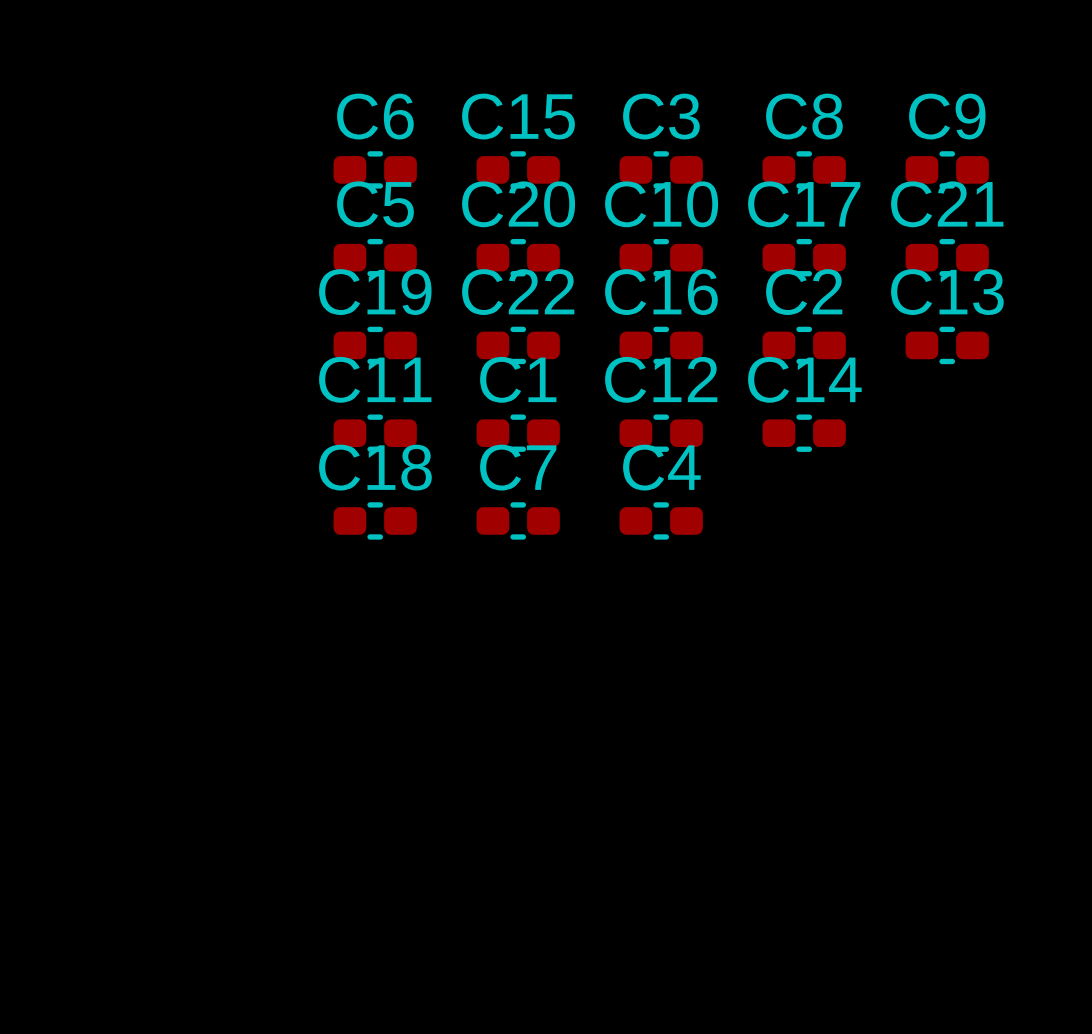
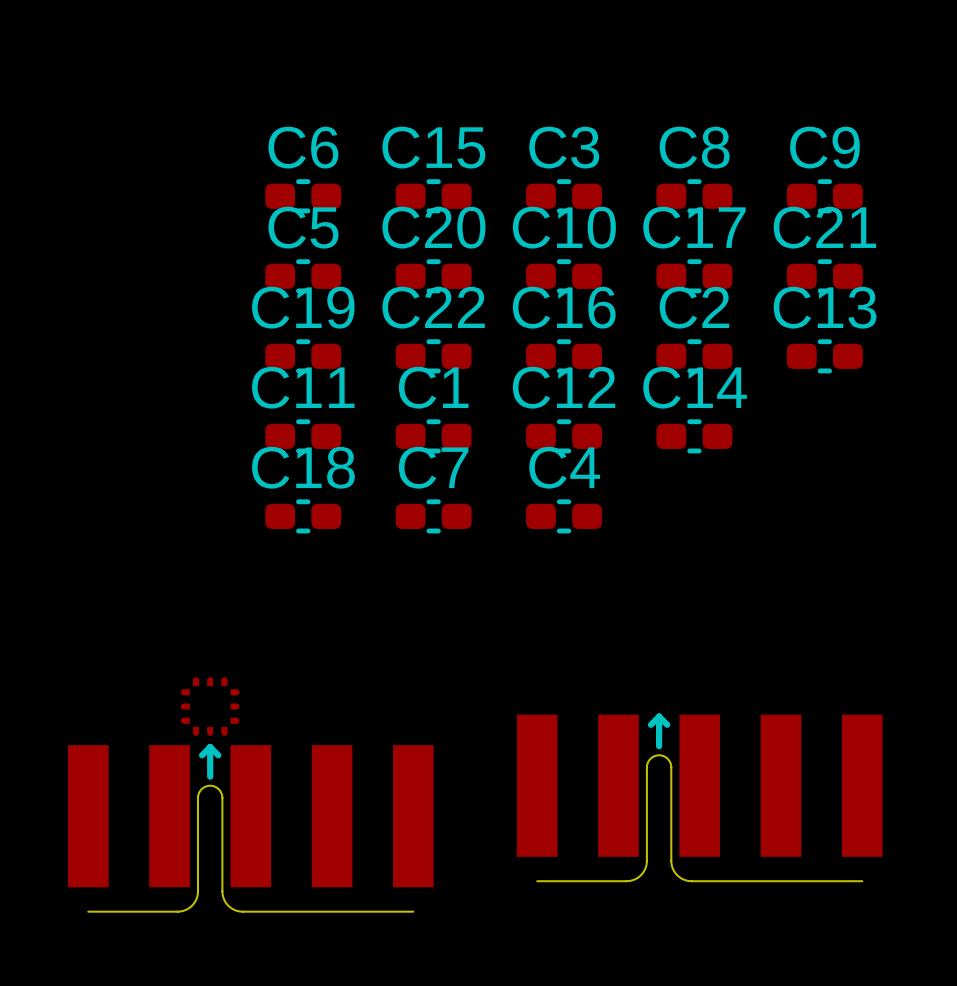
part: none -> (250, 794)
part: none -> (699, 797)

